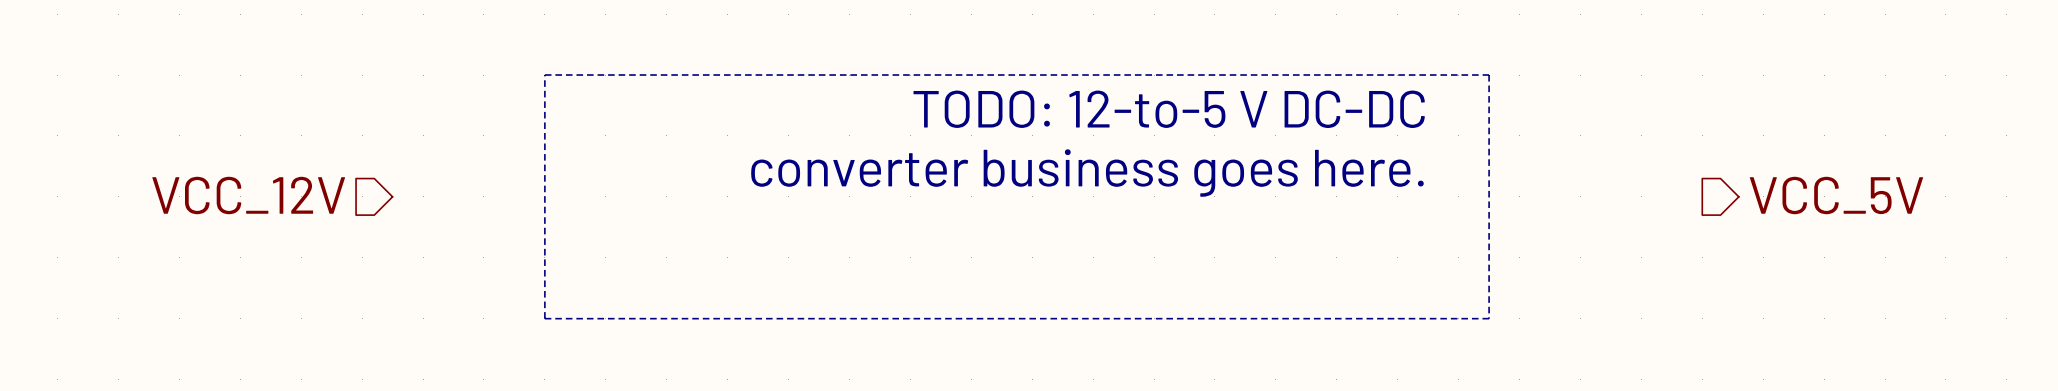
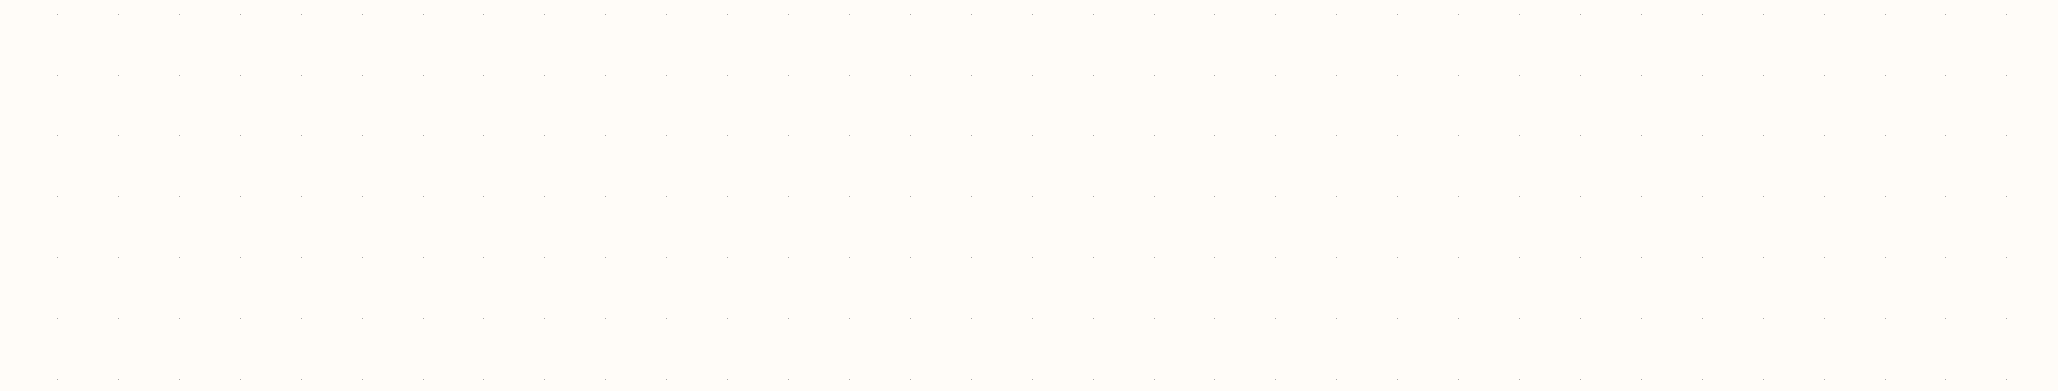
line: (544, 75) (1489, 75) (1489, 318) (544, 318) (544, 75) -> none
text: TODO: 12-to-5 V DC-DC (1169, 109) -> none
text: converter business goes here. (1087, 173) -> none
hierarchical label: VCC_12V (248, 195) -> none
hierarchical label: VCC_5V (1836, 195) -> none

